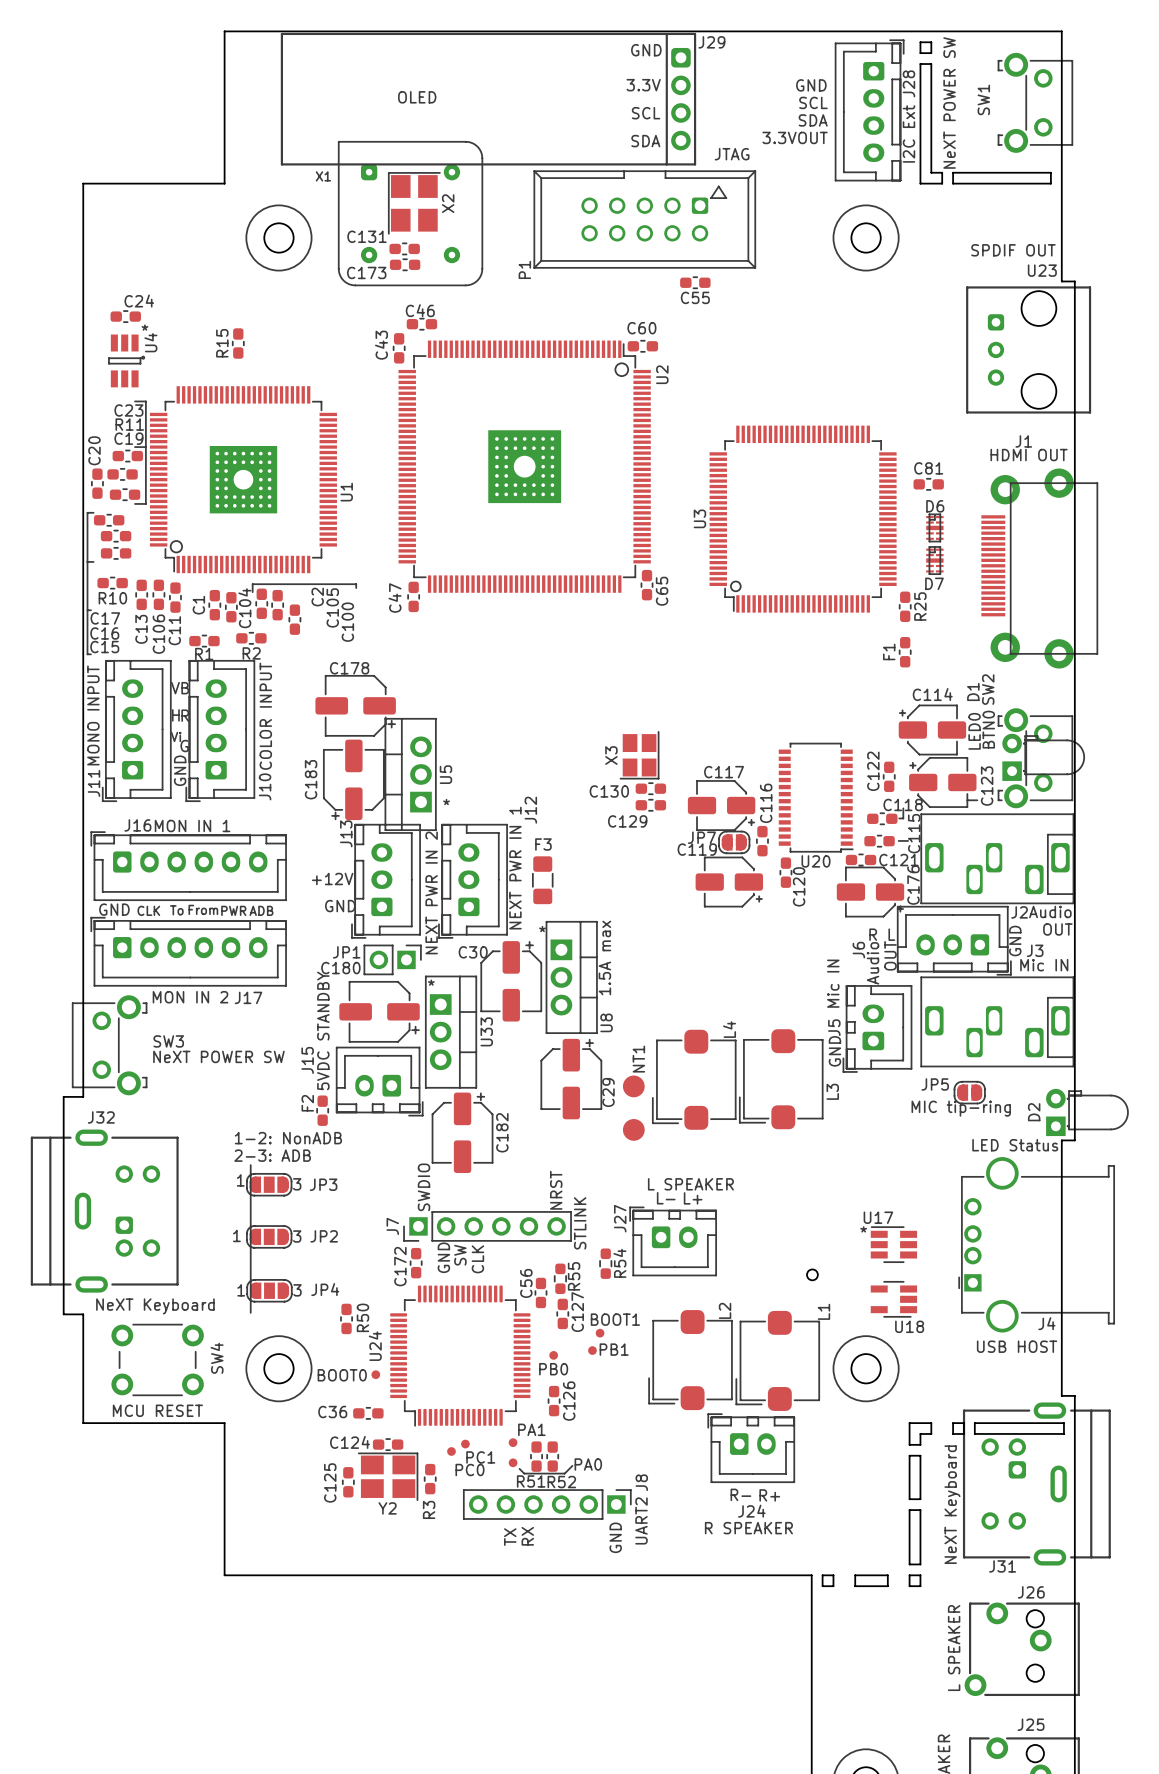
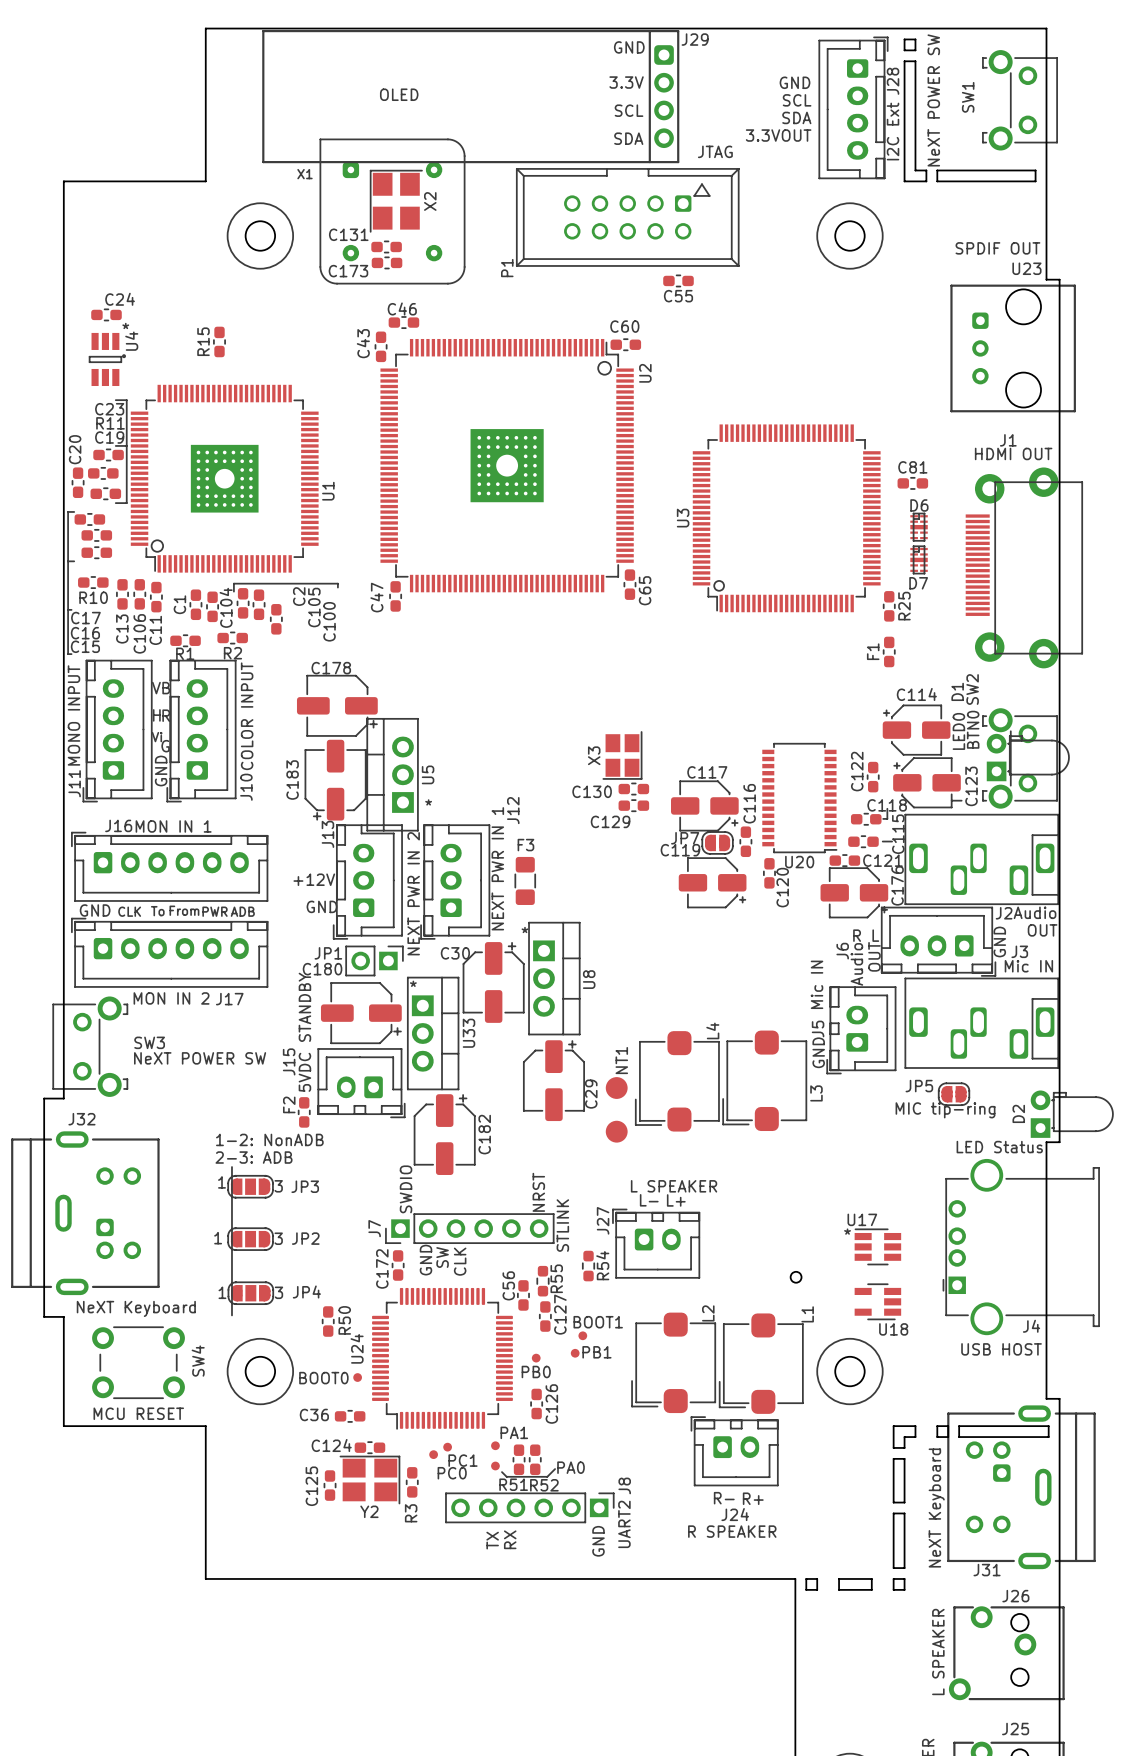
text: 1.5A max (604, 958) -> none
U8 name position: U8 (606, 1022) -> U8 (589, 979)

